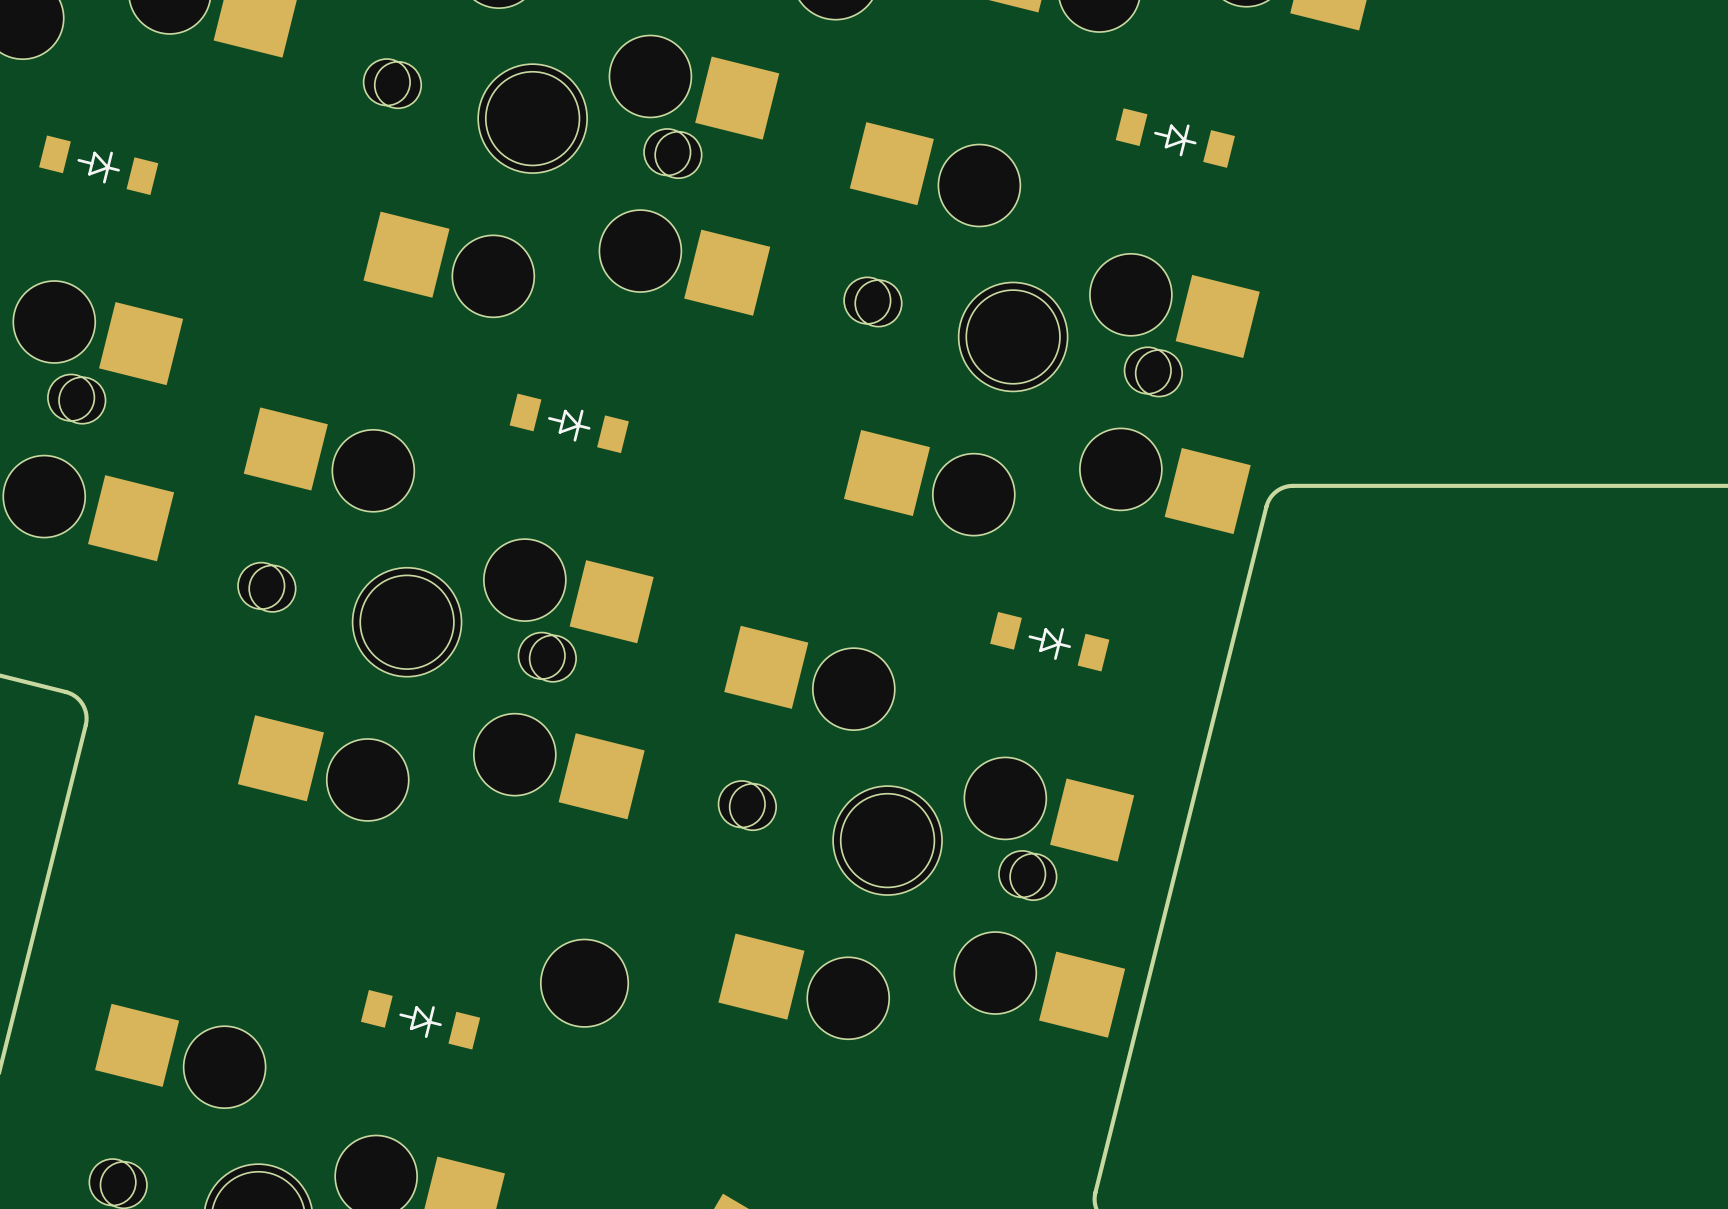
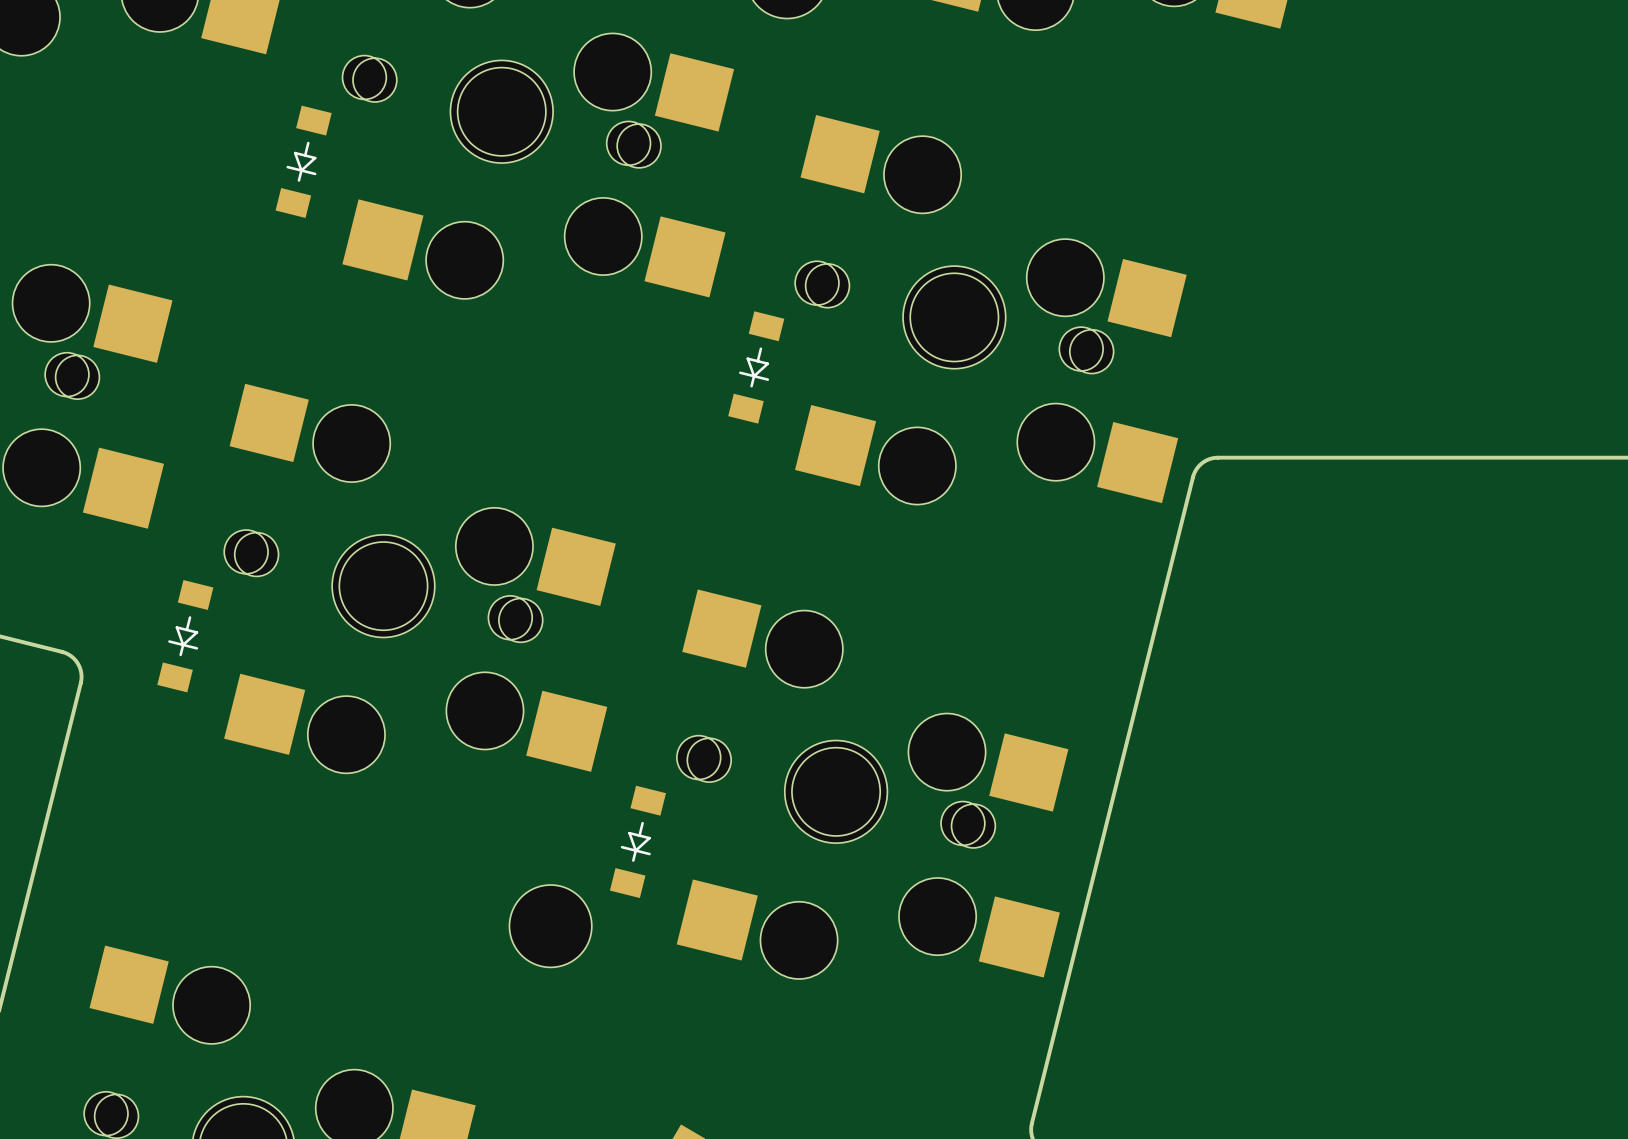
part: (1175, 138) -> none
part: (98, 165) -> none
part: none -> (303, 161)
part: none -> (756, 367)
part: (569, 423) -> none
part: (1049, 641) -> none
part: none -> (185, 636)
part: none -> (637, 841)
part: (420, 1019) -> none

